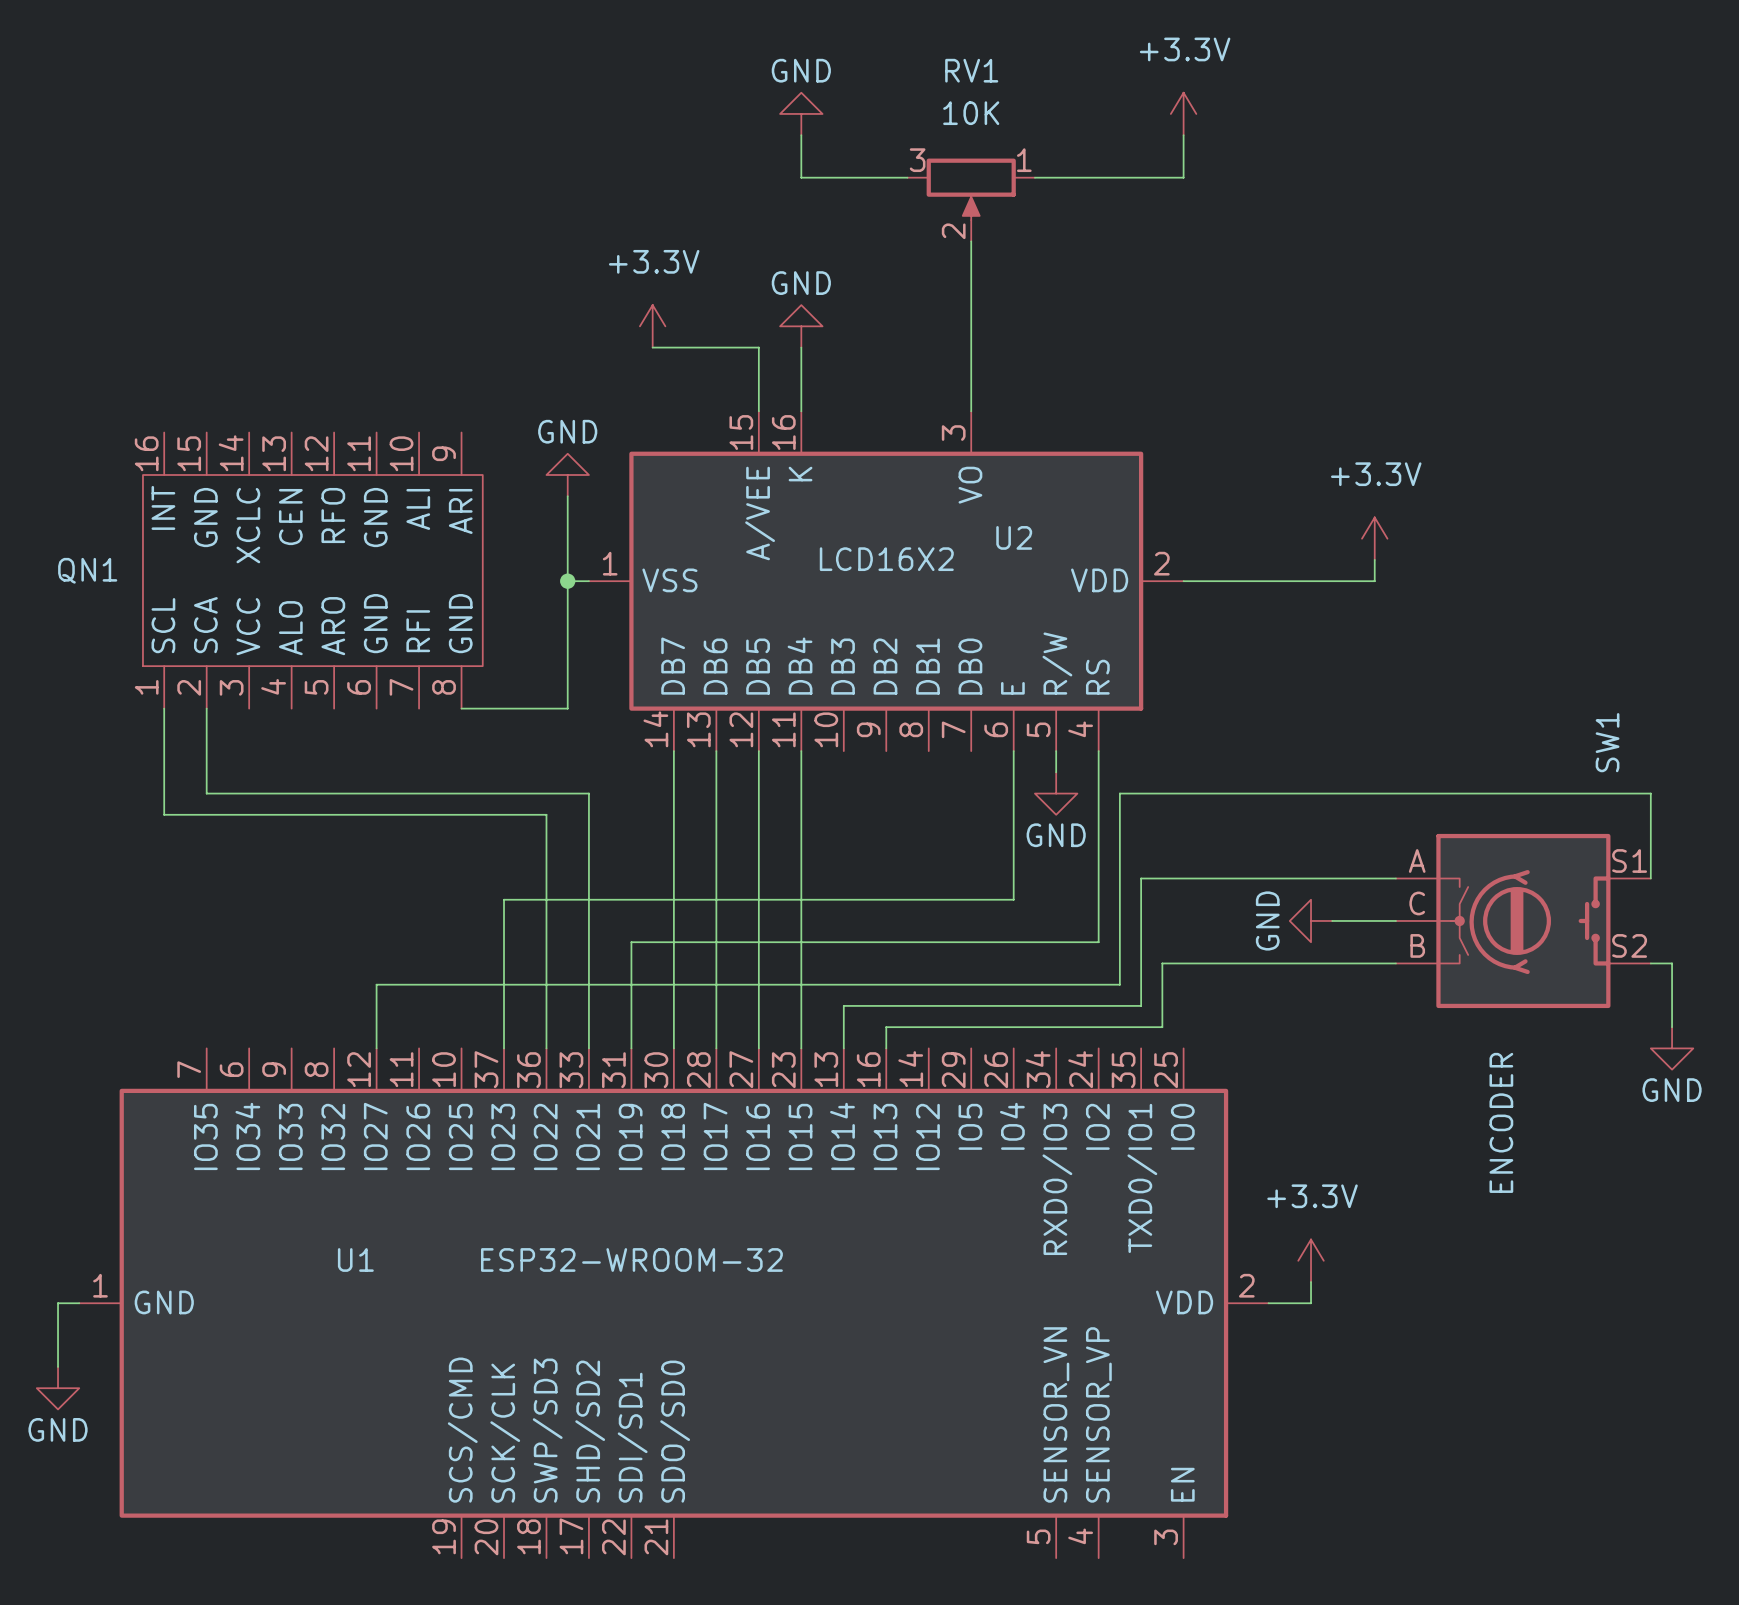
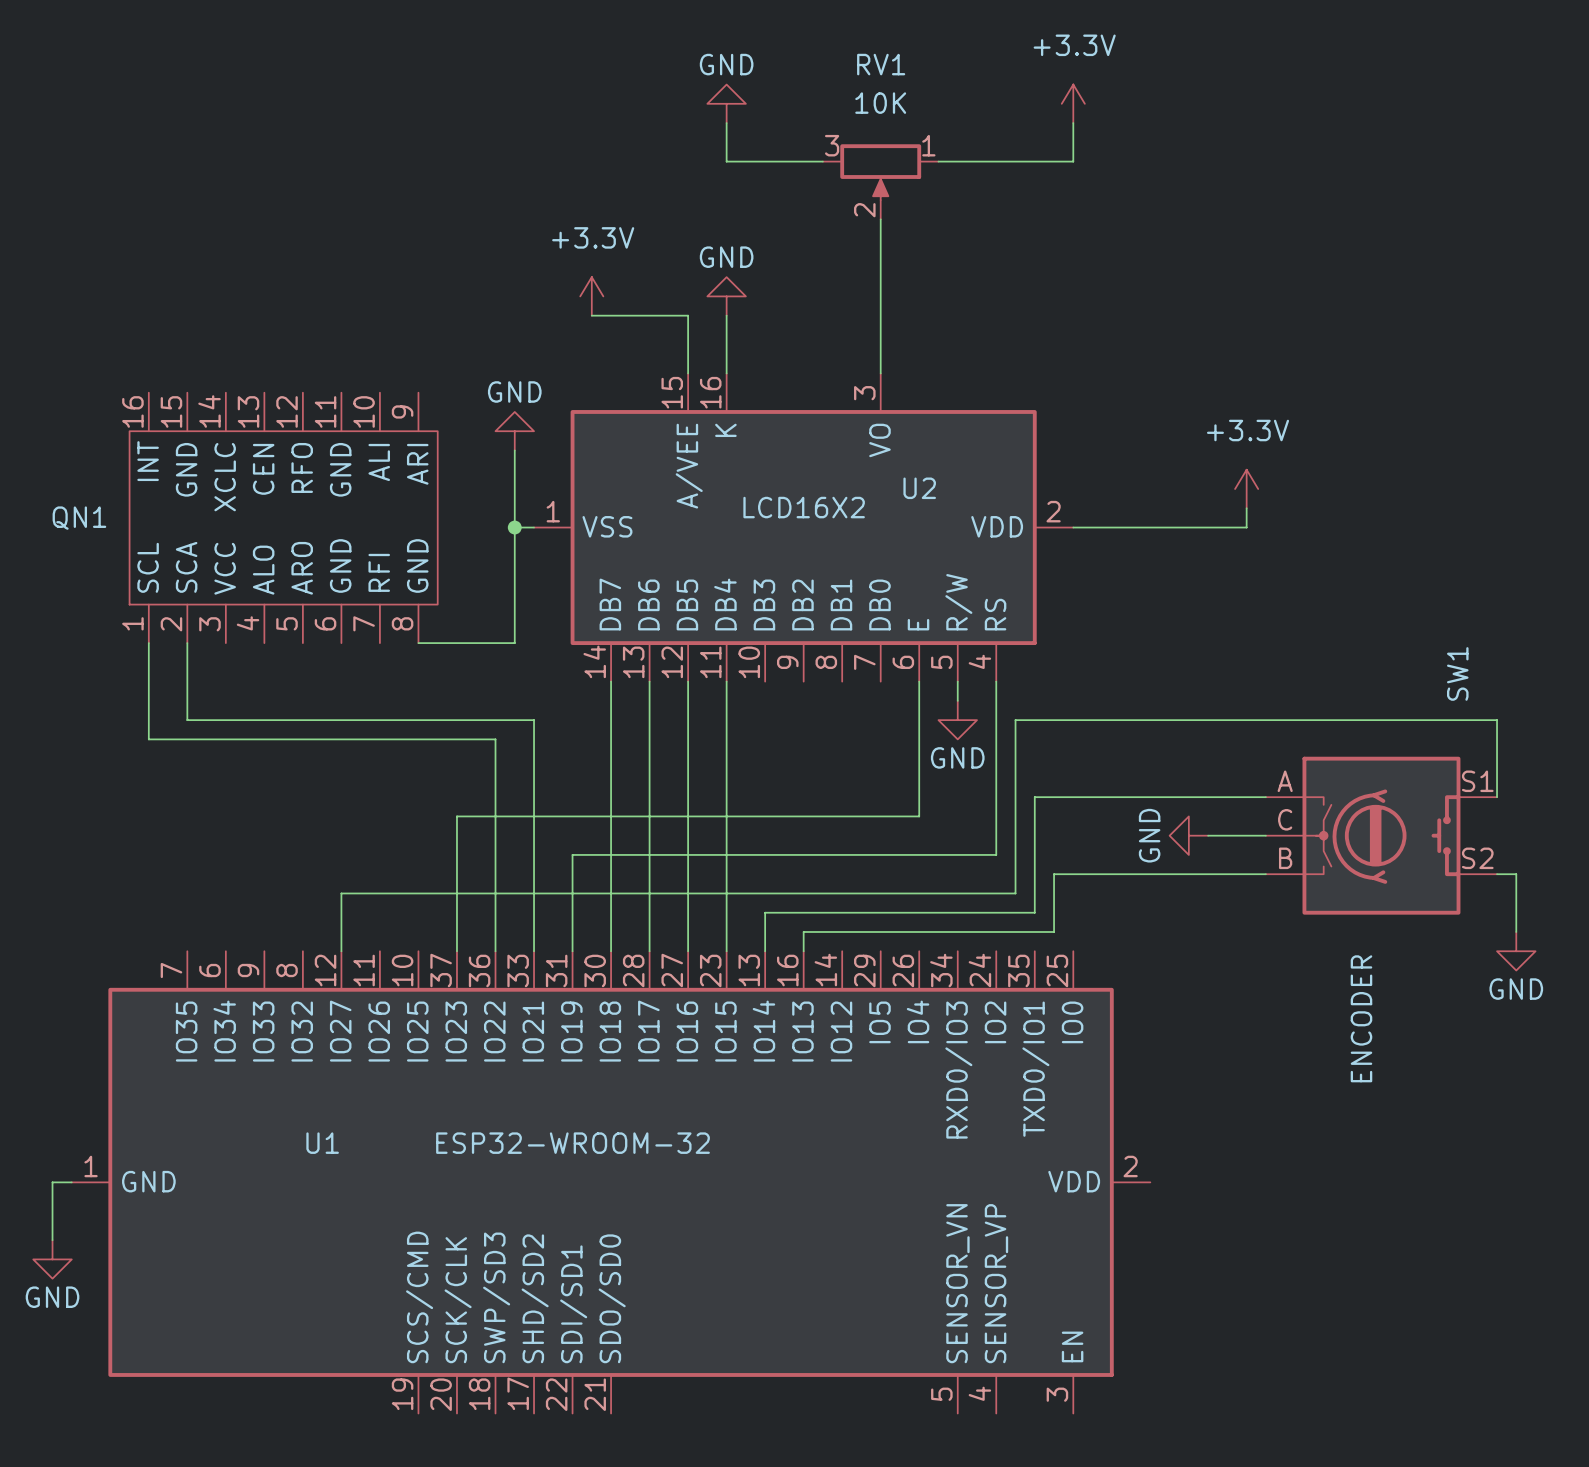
power symbol: +3.3V (1311, 1260) -> none
wire: (1311, 1282) (1311, 1303) (1268, 1303) -> none

